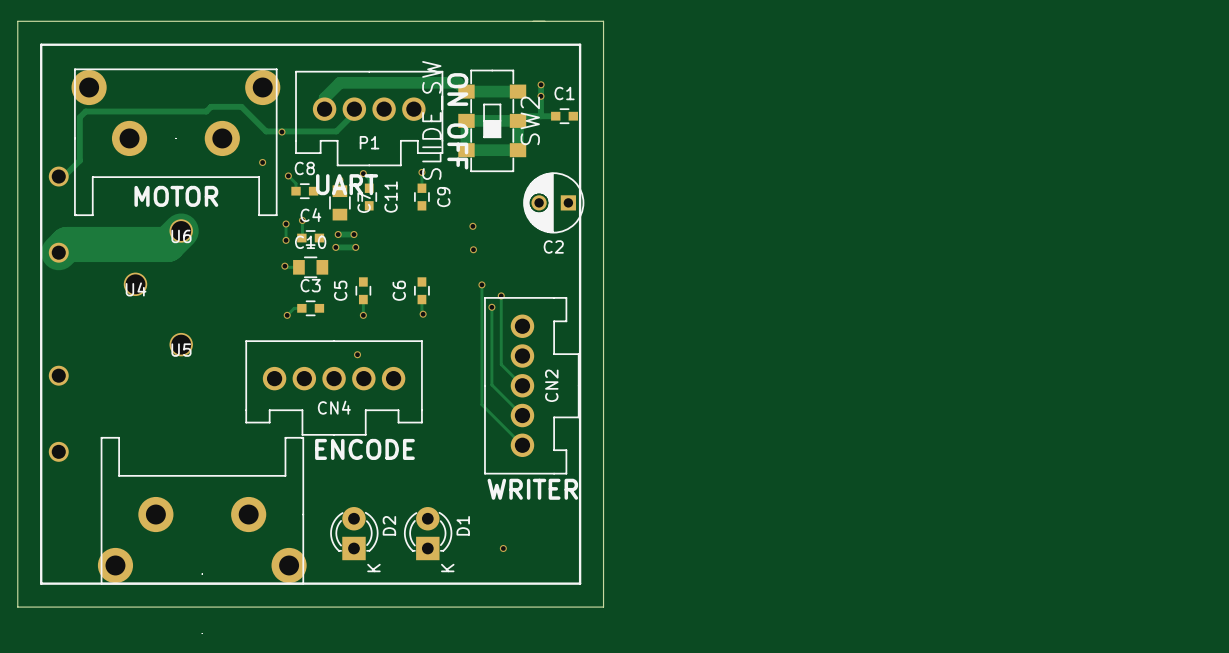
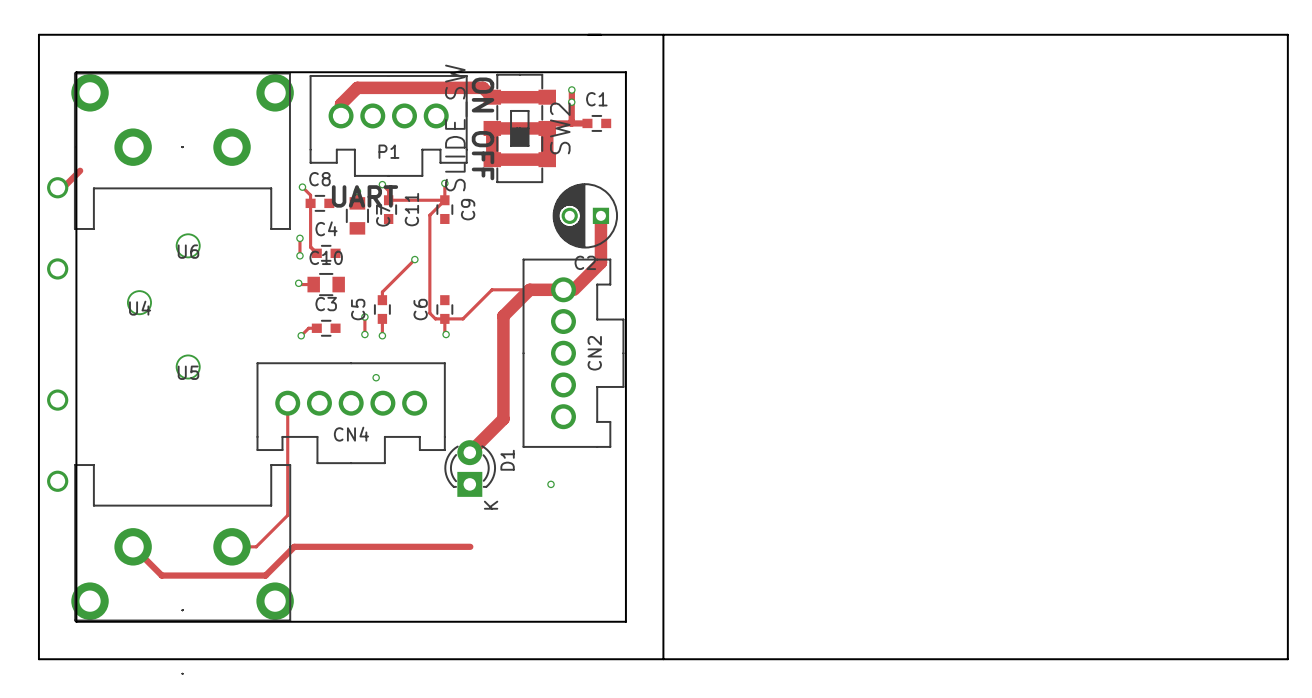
board edge: (17, 21) (603, 21) (603, 607) (17, 607) (17, 21) -> (76, 72) (76, 621) (625, 621) (625, 72) (76, 72)
board edge: none -> (38, 34) (1287, 34) (1287, 659) (38, 659) (38, 34)
board edge: none -> (663, 34) (663, 659)
line: (41, 44) (580, 44) (580, 583) (41, 583) (41, 44) -> none
track: (354, 109) (354, 113) (336, 131) (266, 131) (241, 106) (211, 106) (206, 111) (85, 111) (79, 117) (79, 160) -> none
via: (281, 132) -> none
via: (262, 162) -> none
track: none -> (388, 200) (444, 200) (429, 215) (429, 313) (435, 318) (462, 318) (492, 289) (573, 289) (600, 262) (600, 215)
text: MOTOR (176, 196) -> none
track: (302, 220) (301, 238) -> (310, 203) (310, 247) (316, 253)
via: (302, 220) -> none
via: (472, 226) -> none
track: (181, 231) (167, 244) (66, 244) (58, 252) -> none
track: (338, 234) (354, 234) -> none
via: (338, 234) -> none
via: (354, 234) -> none
track: none -> (414, 259) (382, 292) (382, 300)
via: none -> (414, 259)
track: (335, 247) (355, 247) -> none
via: (335, 247) -> none
via: (355, 247) -> none
via: (473, 249) -> none
track: none -> (563, 289) (529, 289) (503, 316) (503, 419) (469, 452)
track: (481, 284) (481, 404) (522, 445) -> none
via: (481, 284) -> none
track: (501, 295) (501, 364) (522, 385) -> none
via: (501, 295) -> none
track: none -> (364, 317) (364, 334)
via: none -> (364, 317)
track: (491, 307) (491, 384) (522, 415) -> none
via: (491, 307) -> none
via: none -> (364, 334)
track: none -> (287, 403) (287, 515) (256, 546) (232, 546)
CN2 position: (531, 385) -> (573, 353)
text: ENCODE (364, 449) -> none
via: none -> (551, 484)
text: WRITER (532, 489) -> none
part position: (202, 510) -> (182, 542)
track: none -> (133, 546) (161, 575) (265, 575) (294, 546) (470, 546)
D2: (354, 533) -> none
D1 position: (428, 533) -> (470, 468)
via: (503, 548) -> none

